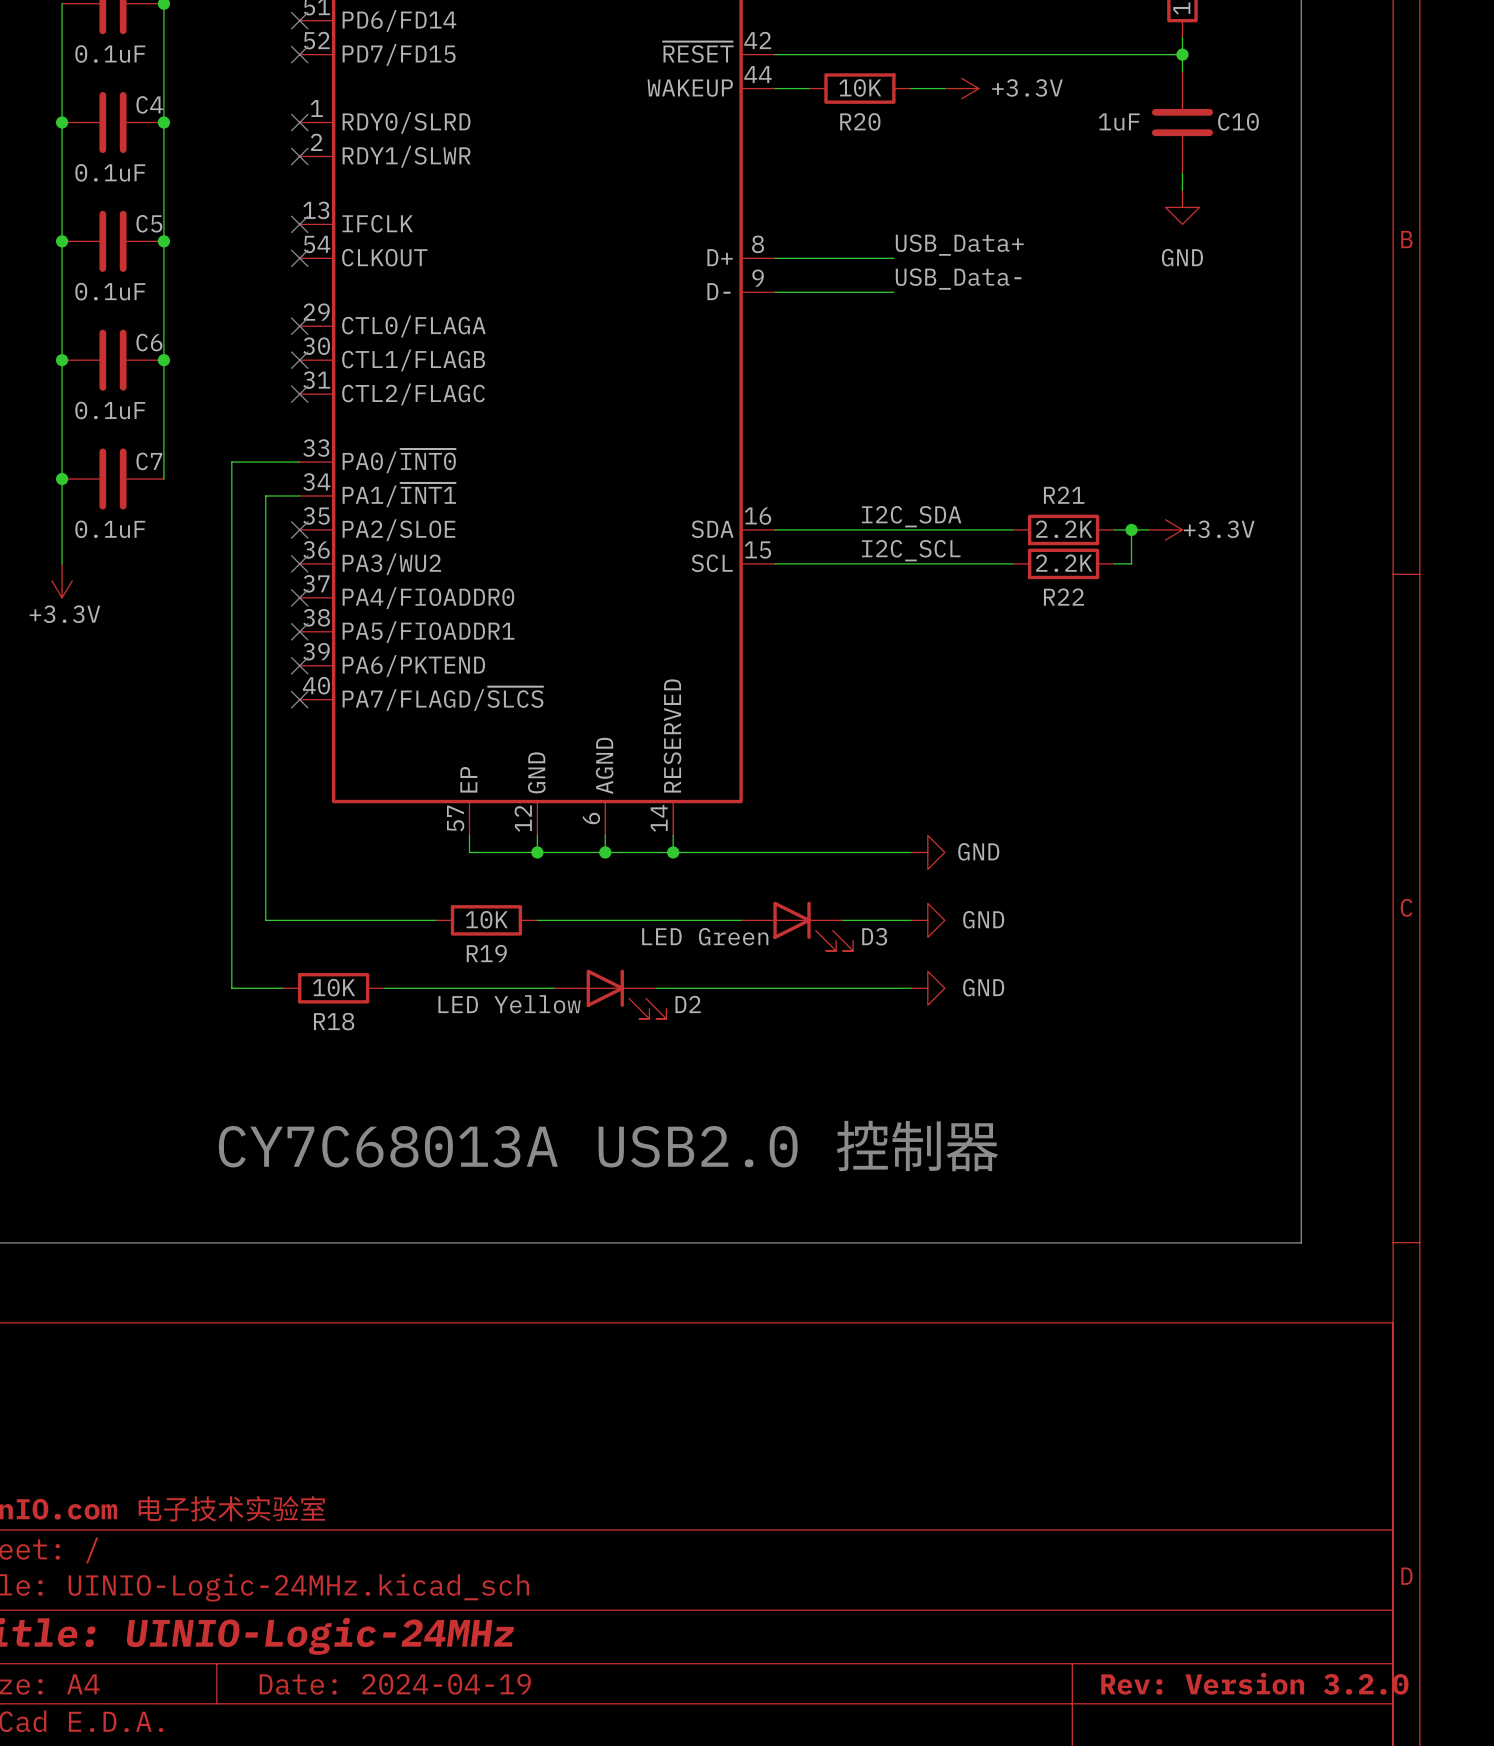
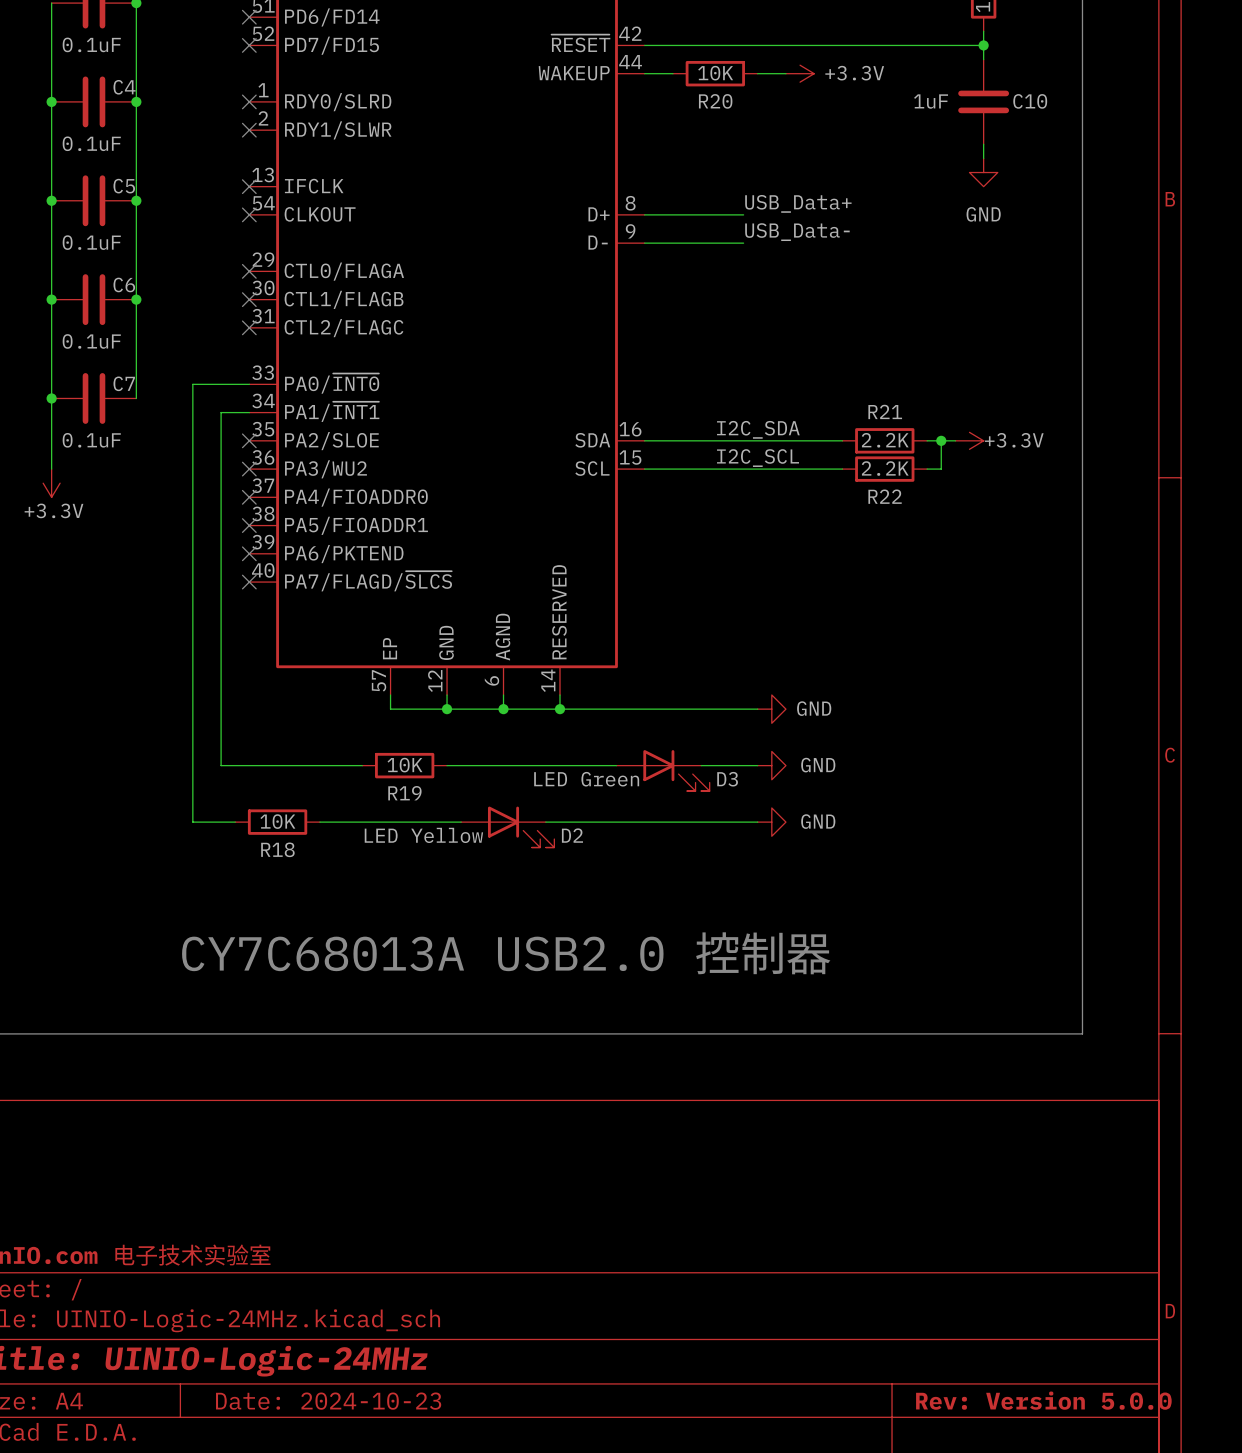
title block: Rev: Version 3.2.0 (1254, 1683) -> Rev: Version 5.0.0 (1043, 1400)
title block: Date: 2024-04-19 (395, 1684) -> Date: 2024-10-23 (328, 1401)

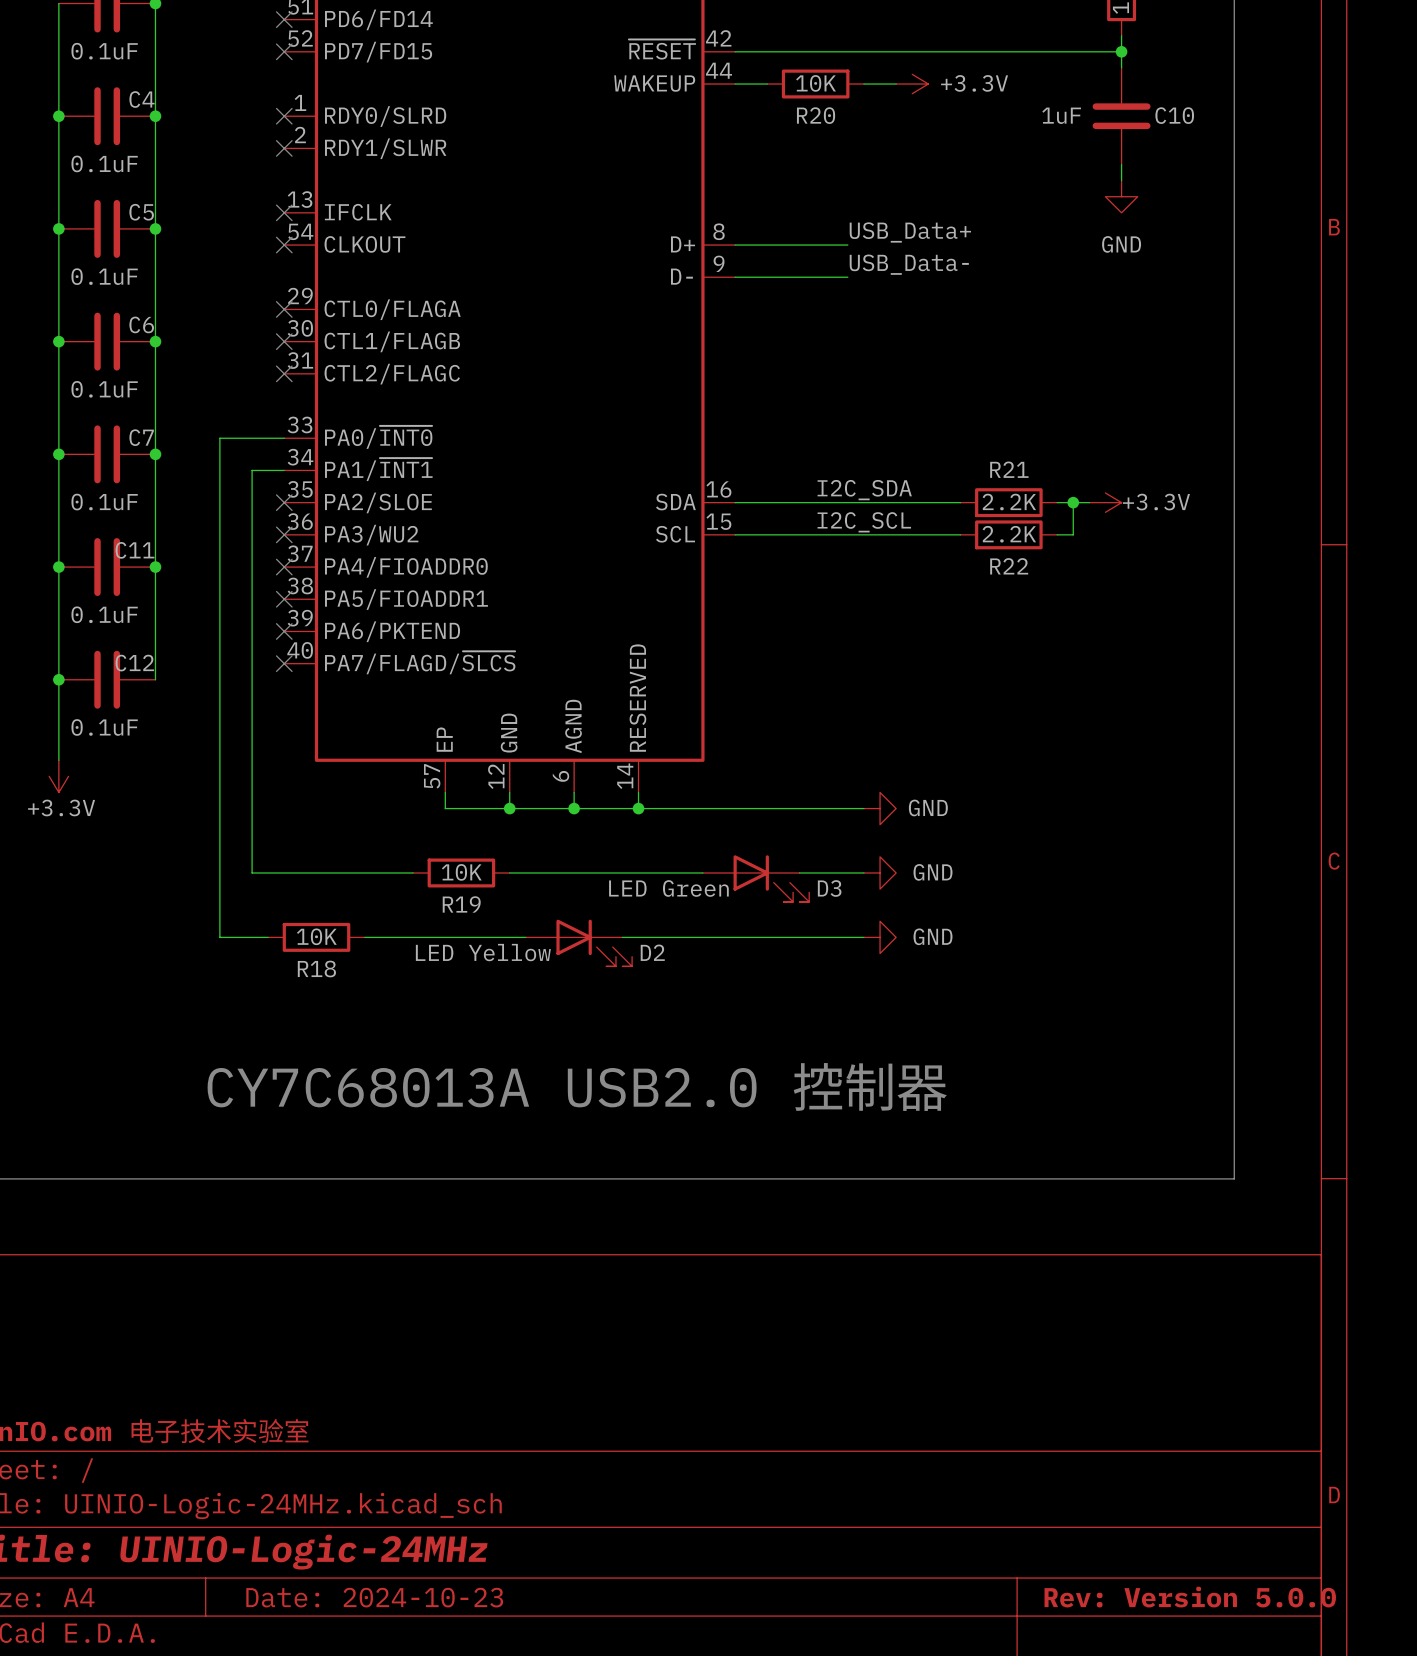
wire: none -> (155, 454) (155, 679)
junction: none -> (155, 454)
wire: none -> (58, 534) (58, 760)
power symbol position: +3.3V (51, 483) -> +3.3V (58, 776)
junction: none -> (58, 567)
C11: none -> 0.1uF (107, 567)
junction: none -> (155, 567)
junction: none -> (58, 679)
C12: none -> 0.1uF (107, 679)

